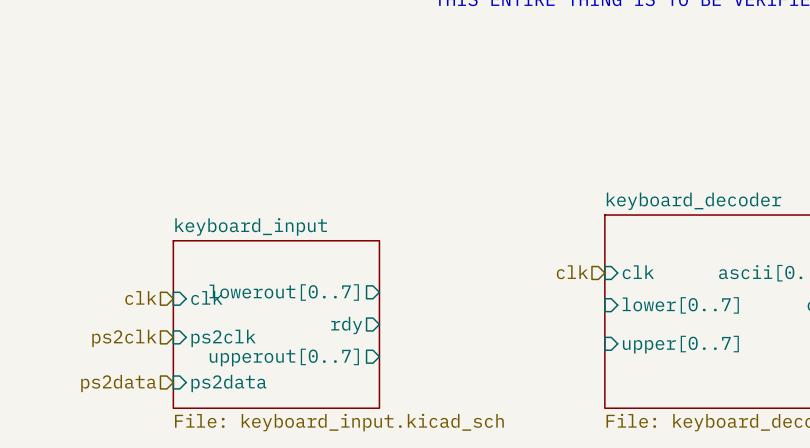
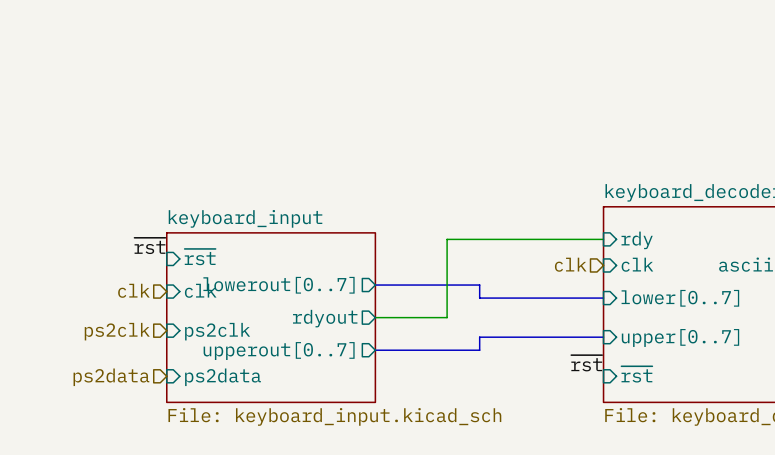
wire: none -> (603, 239) (447, 239) (447, 317) (375, 317)
sheet pin: none -> rdy (637, 240)
label: none -> ~{rst} (149, 245)
sheet pin: none -> ~{rst} (200, 257)
bus: none -> (375, 285) (479, 285) (479, 298) (603, 298)
sheet pin: rdy (346, 325) -> rdyout (325, 318)
bus: none -> (603, 337) (479, 337) (479, 350) (375, 350)
label: none -> ~{rst} (586, 363)
sheet pin: none -> ~{rst} (636, 374)

